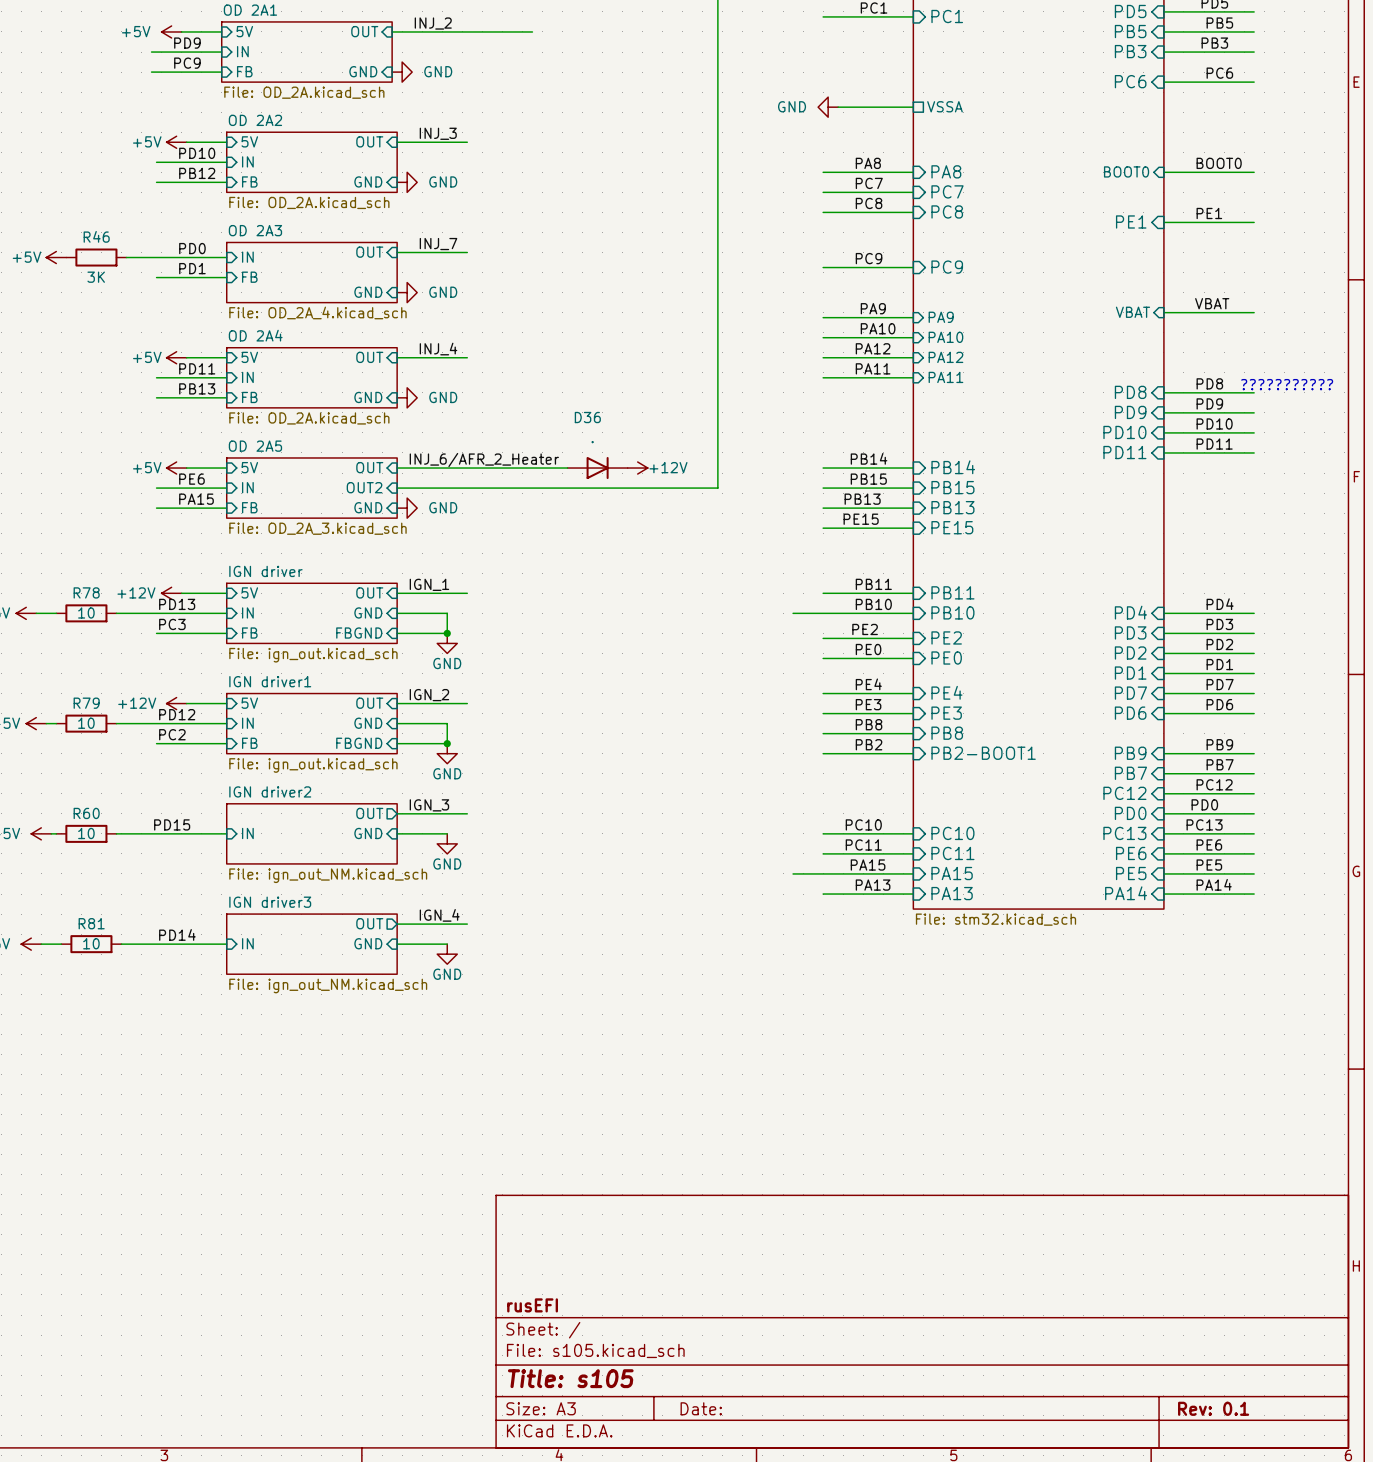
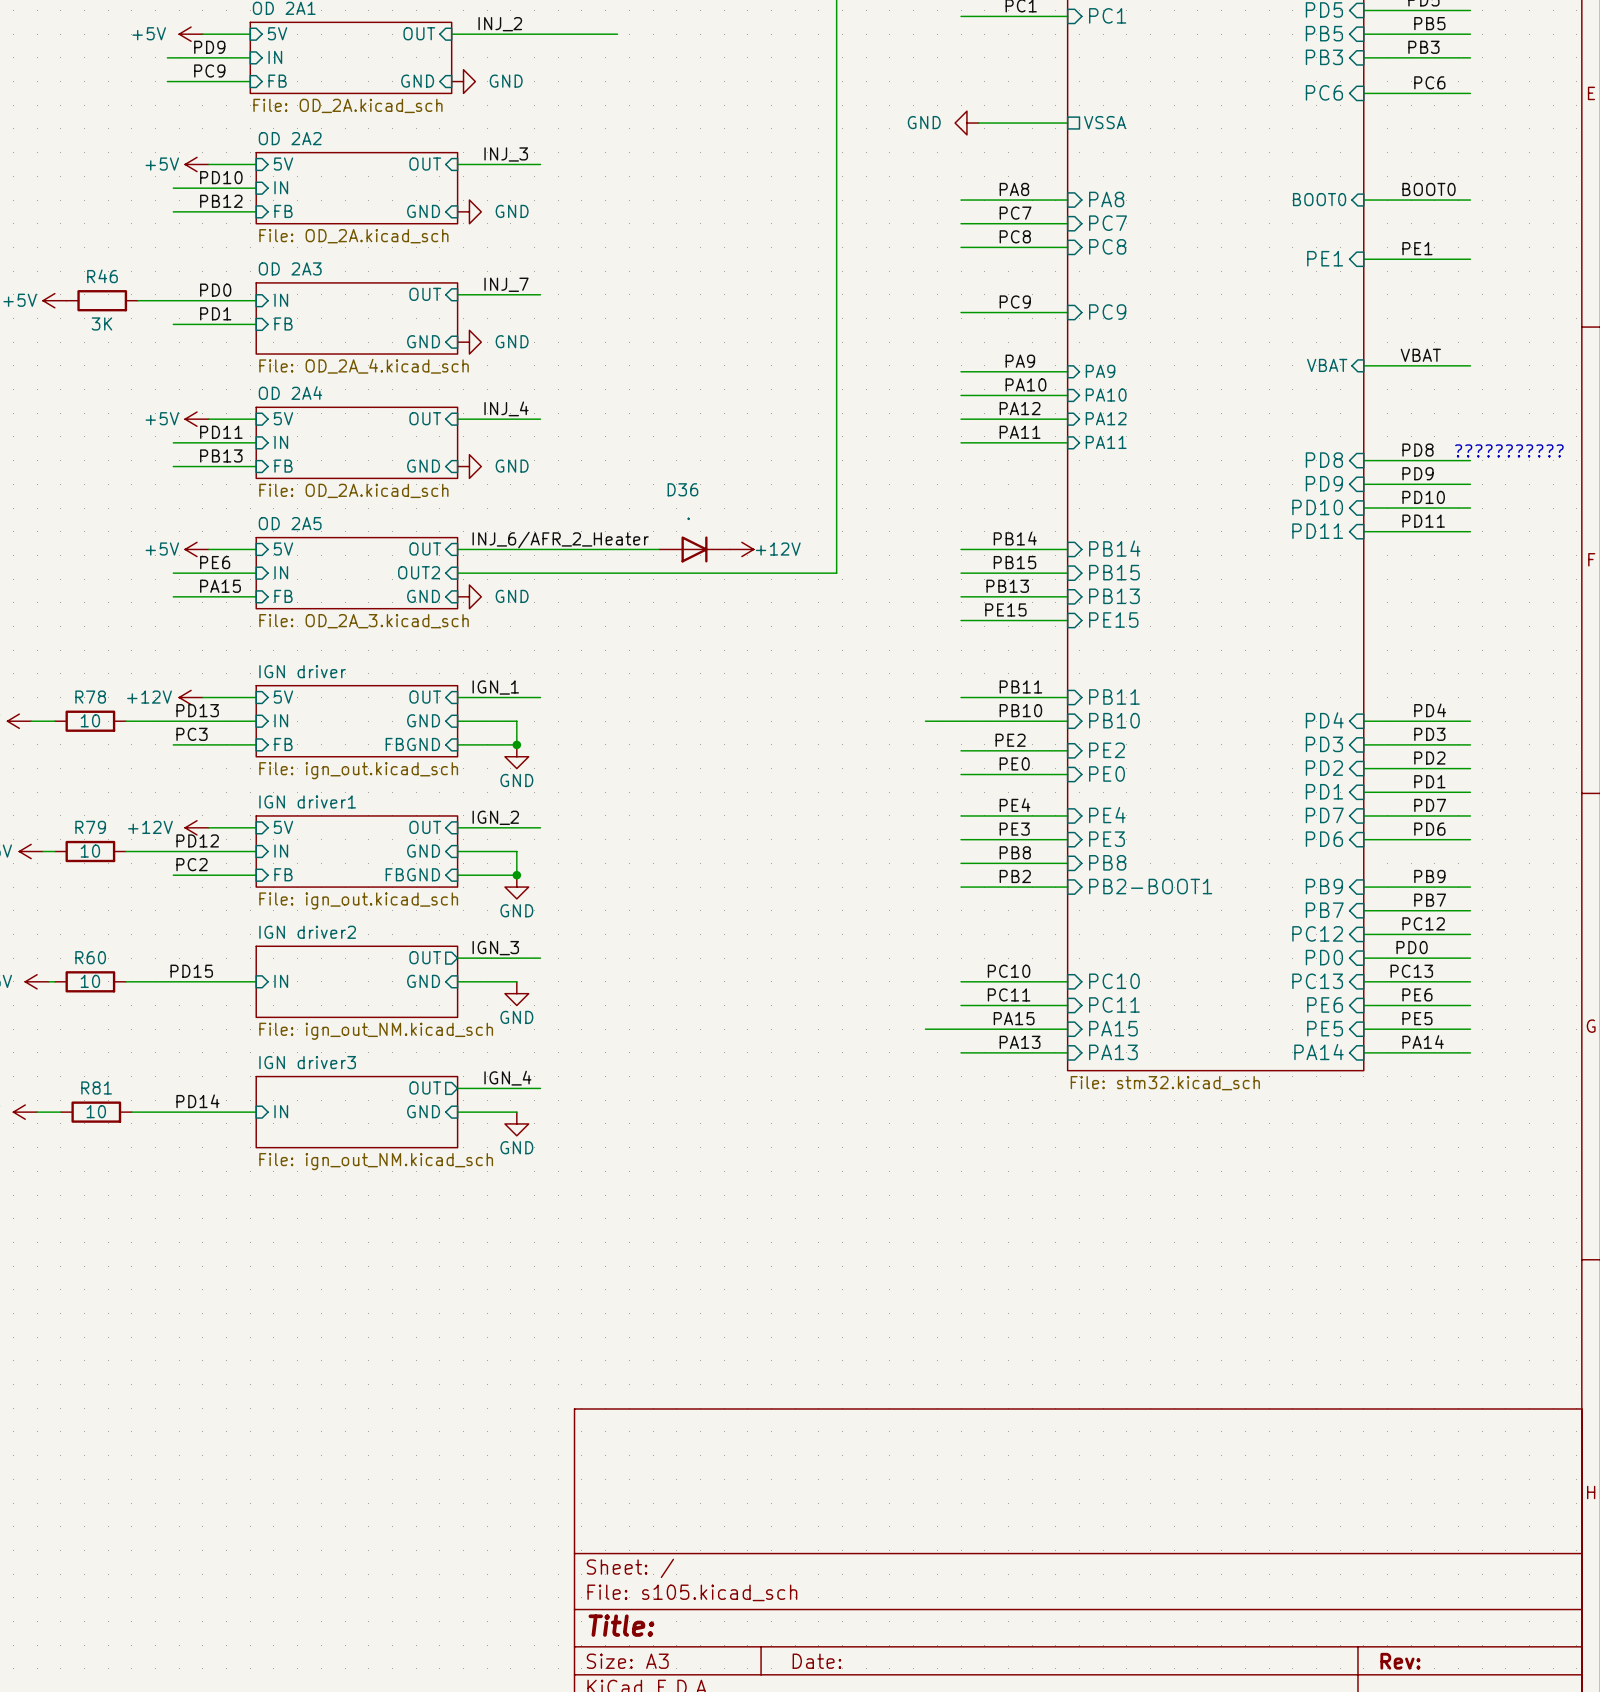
title block: rusEFI (532, 1305) -> none
title block: Title: s105 (570, 1378) -> Title: (621, 1625)
title block: Rev: 0.1 (1213, 1408) -> Rev: (1400, 1661)

